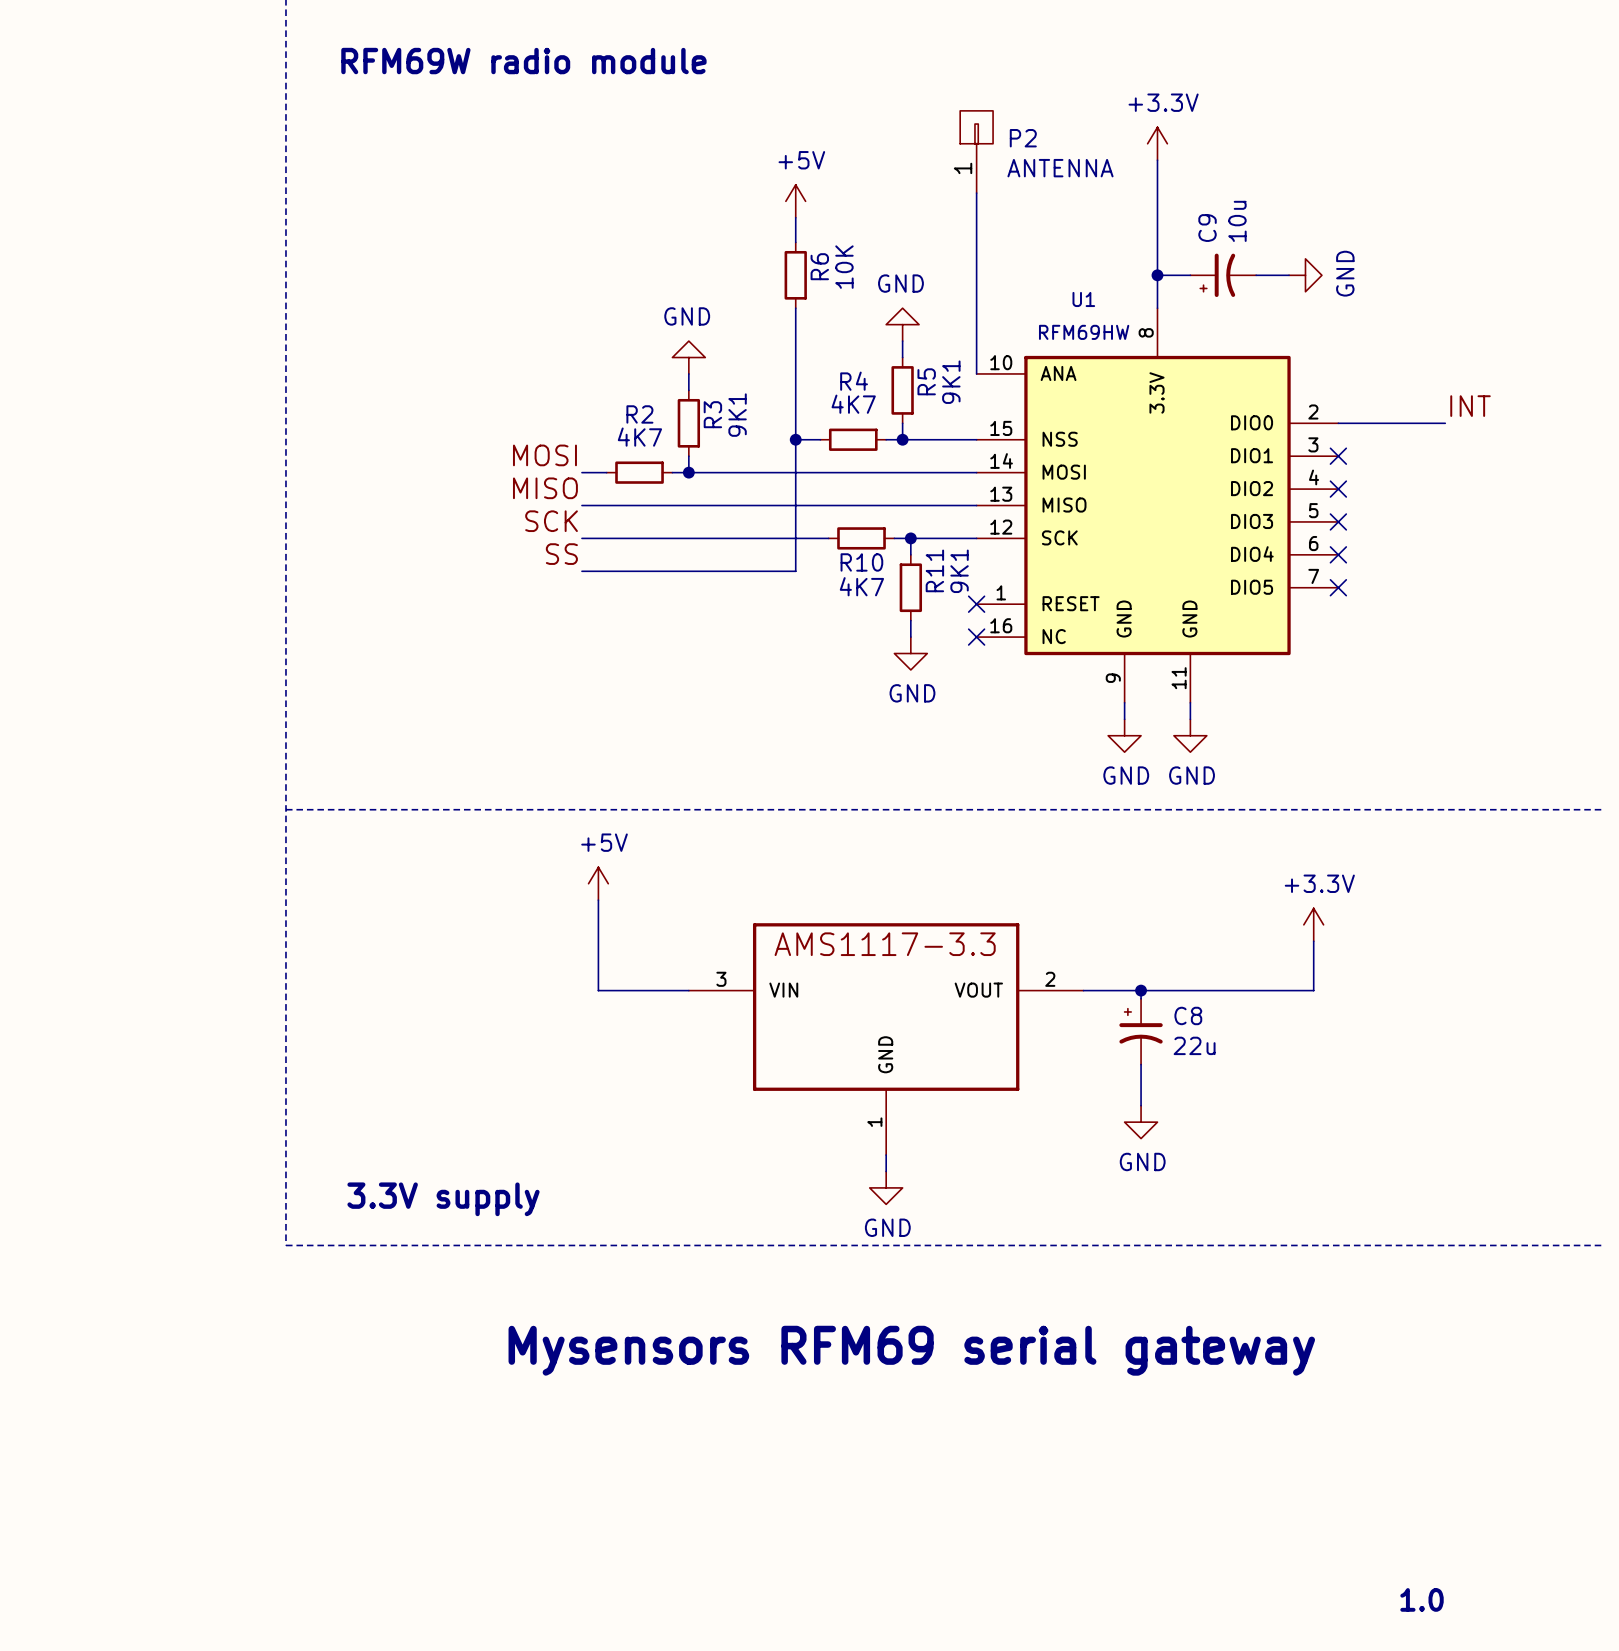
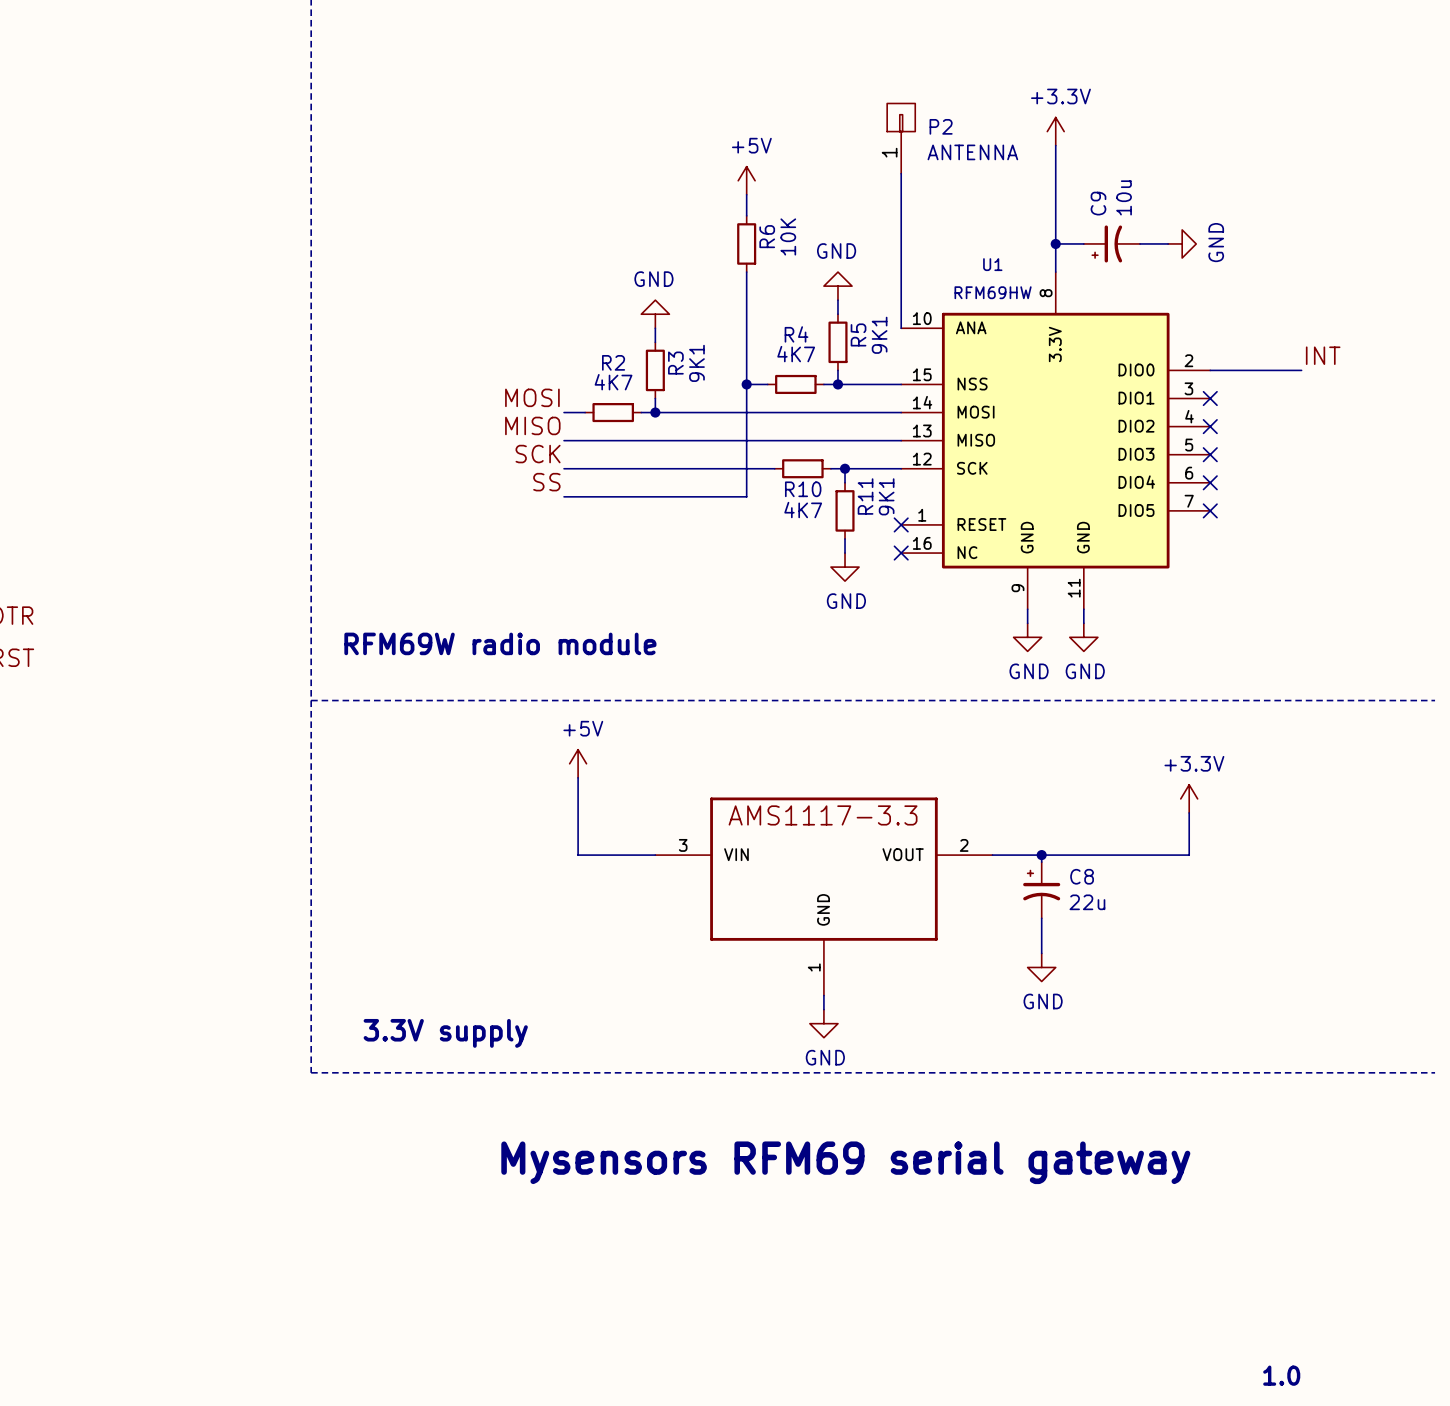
text: RFM69W radio module (523, 61) -> none
text: none -> RFM69W radio module (500, 643)

